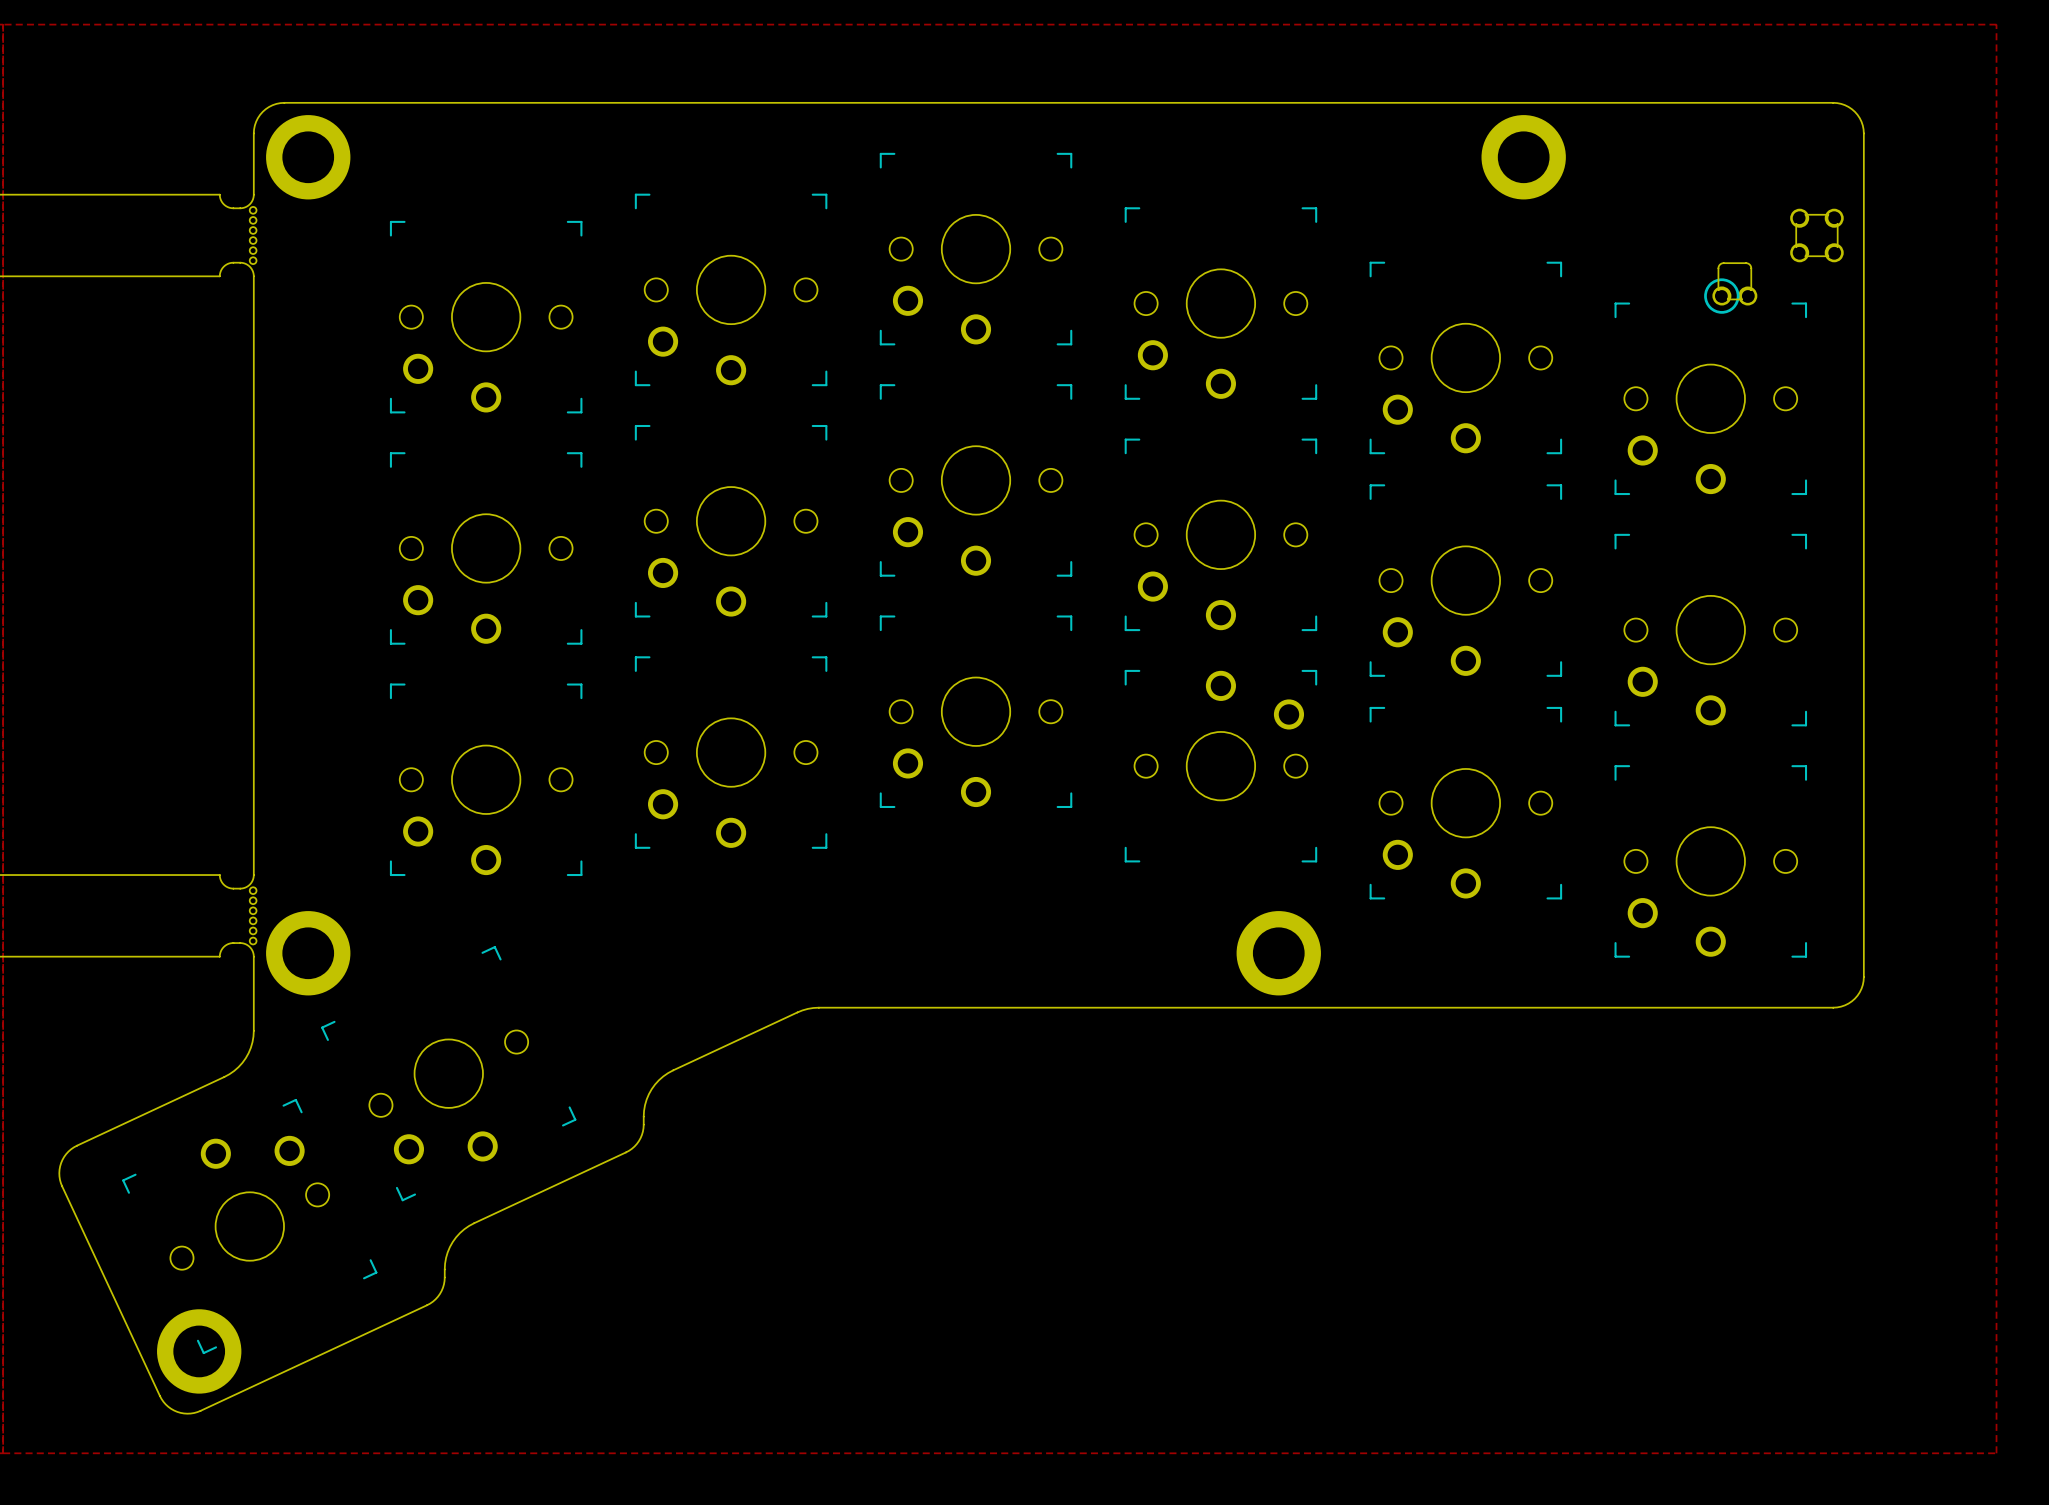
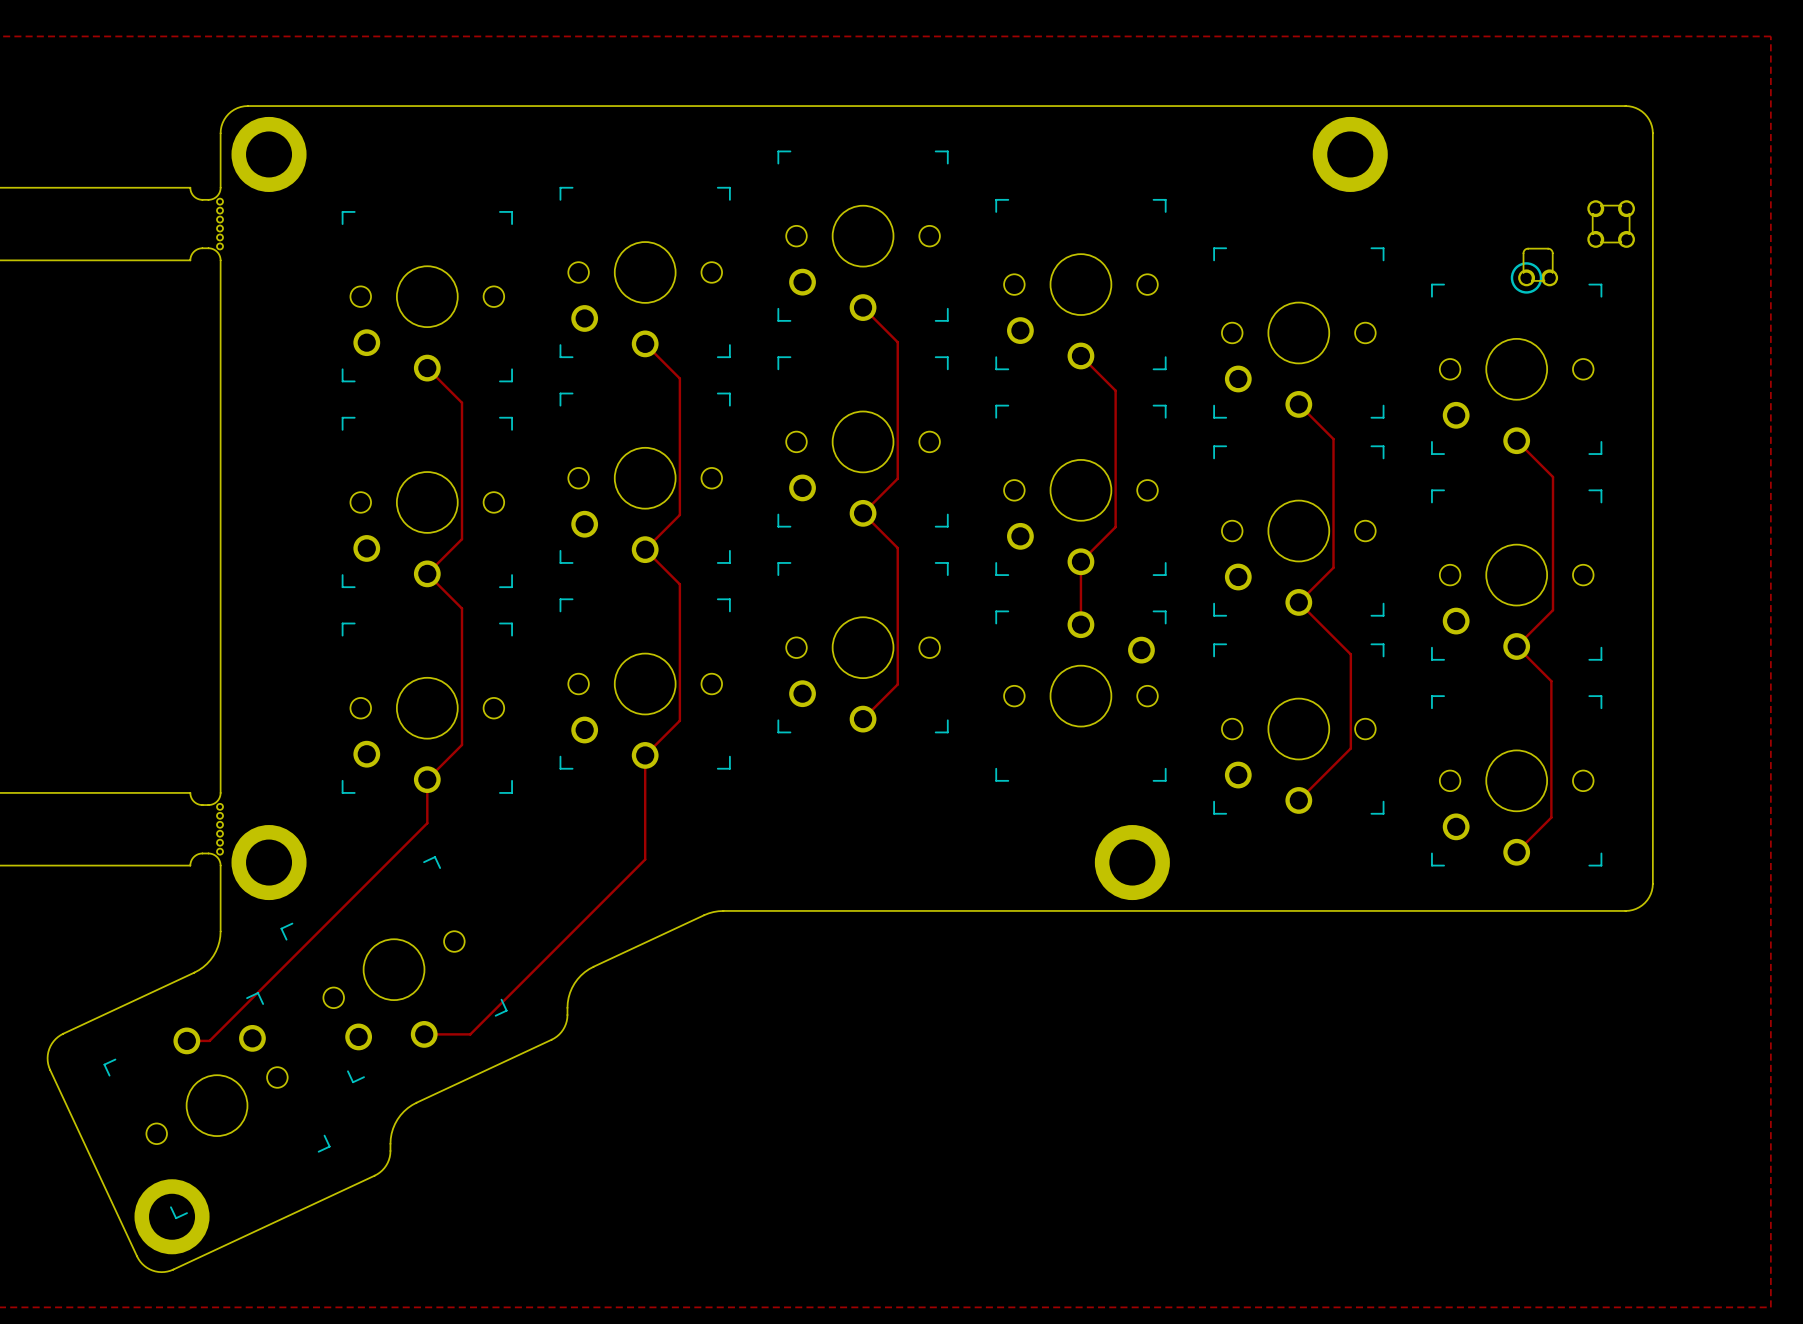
track: none -> (863, 307) (897, 342) (897, 478) (863, 513) (897, 548) (897, 684) (863, 719)
track: none -> (645, 343) (679, 378) (679, 514) (645, 549) (679, 584) (679, 720) (645, 755) (645, 859) (470, 1034) (424, 1034)
track: none -> (1080, 355) (1115, 390) (1115, 527) (1080, 561) (1080, 624)
track: none -> (427, 368) (462, 402) (462, 539) (427, 573) (462, 608) (462, 744) (427, 779) (427, 823) (209, 1040) (186, 1040)
track: none -> (1298, 404) (1333, 439) (1333, 567) (1298, 602) (1350, 654) (1350, 748) (1298, 800)
track: none -> (1516, 440) (1553, 477) (1553, 610) (1516, 646) (1551, 681) (1551, 817) (1516, 852)

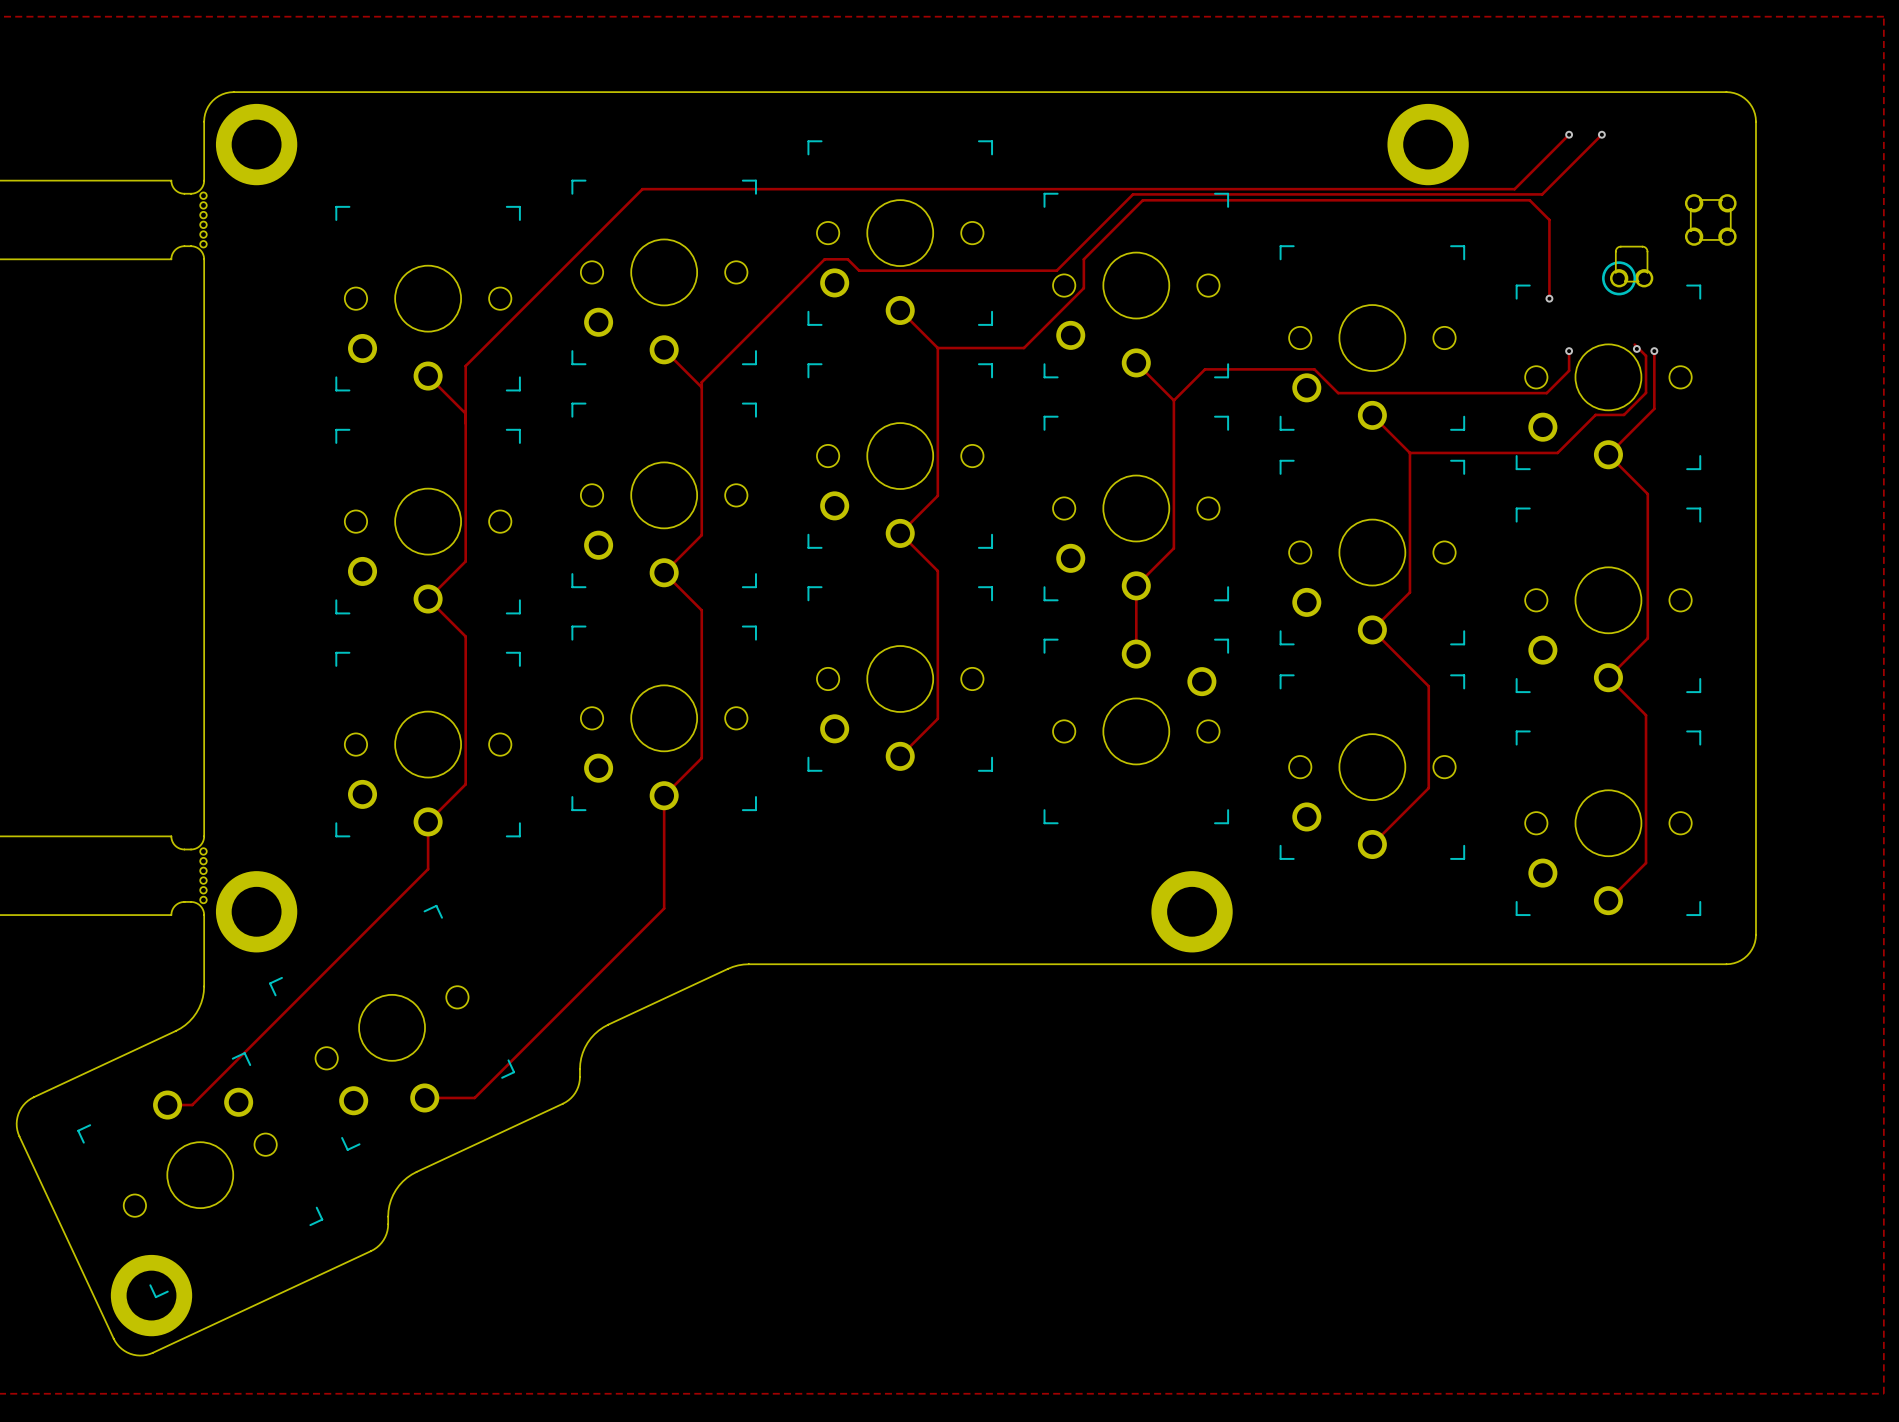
track: none -> (1569, 134) (1514, 189) (642, 189) (465, 366) (465, 413)
via: none -> (1569, 134)
track: none -> (1601, 134) (1542, 194) (1133, 194) (1056, 270) (859, 270) (847, 259) (824, 259) (701, 382) (701, 387)
via: none -> (1601, 134)
track: none -> (1549, 298) (1549, 219) (1529, 200) (1142, 200) (1083, 259) (1083, 288) (1023, 348) (937, 348)
via: none -> (1549, 298)
track: none -> (1634, 344) (1646, 355) (1646, 392) (1624, 414) (1595, 414) (1557, 452) (1409, 452)
via: none -> (1636, 348)
track: none -> (1569, 351) (1569, 370) (1546, 393) (1338, 393) (1314, 369) (1205, 369) (1173, 400)
via: none -> (1569, 351)
track: none -> (1654, 351) (1654, 408) (1608, 454)
via: none -> (1654, 351)

